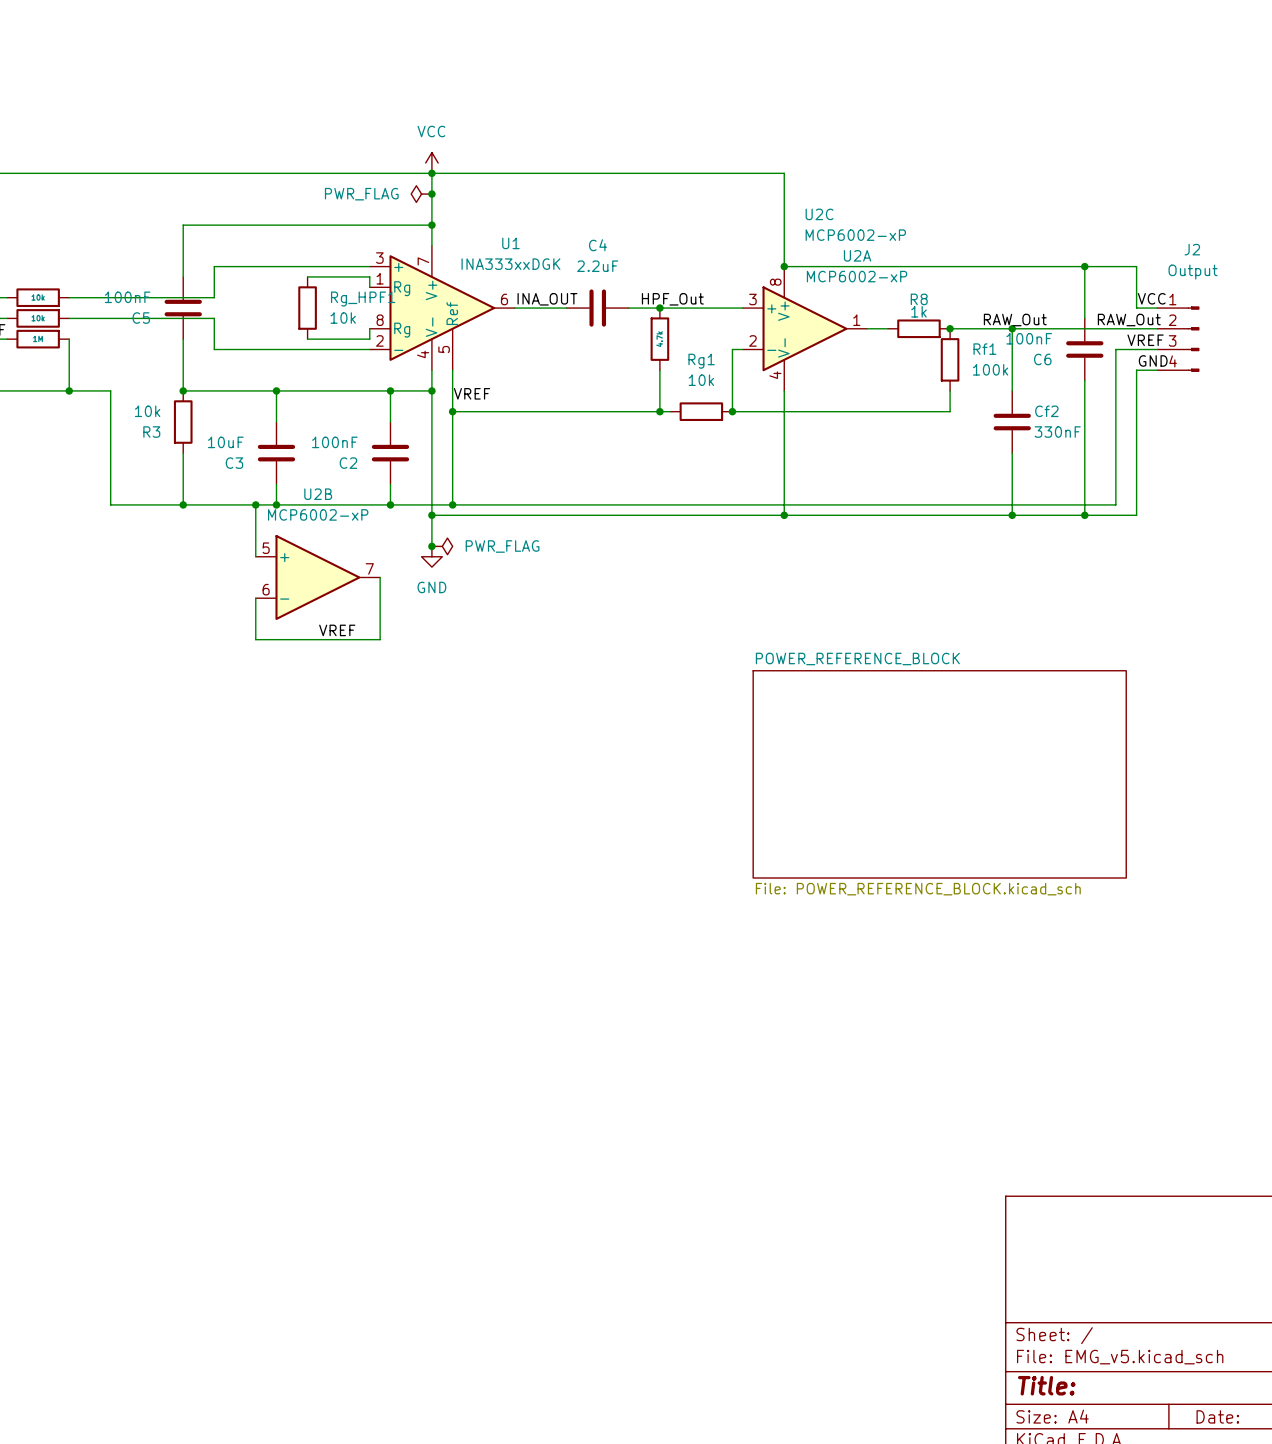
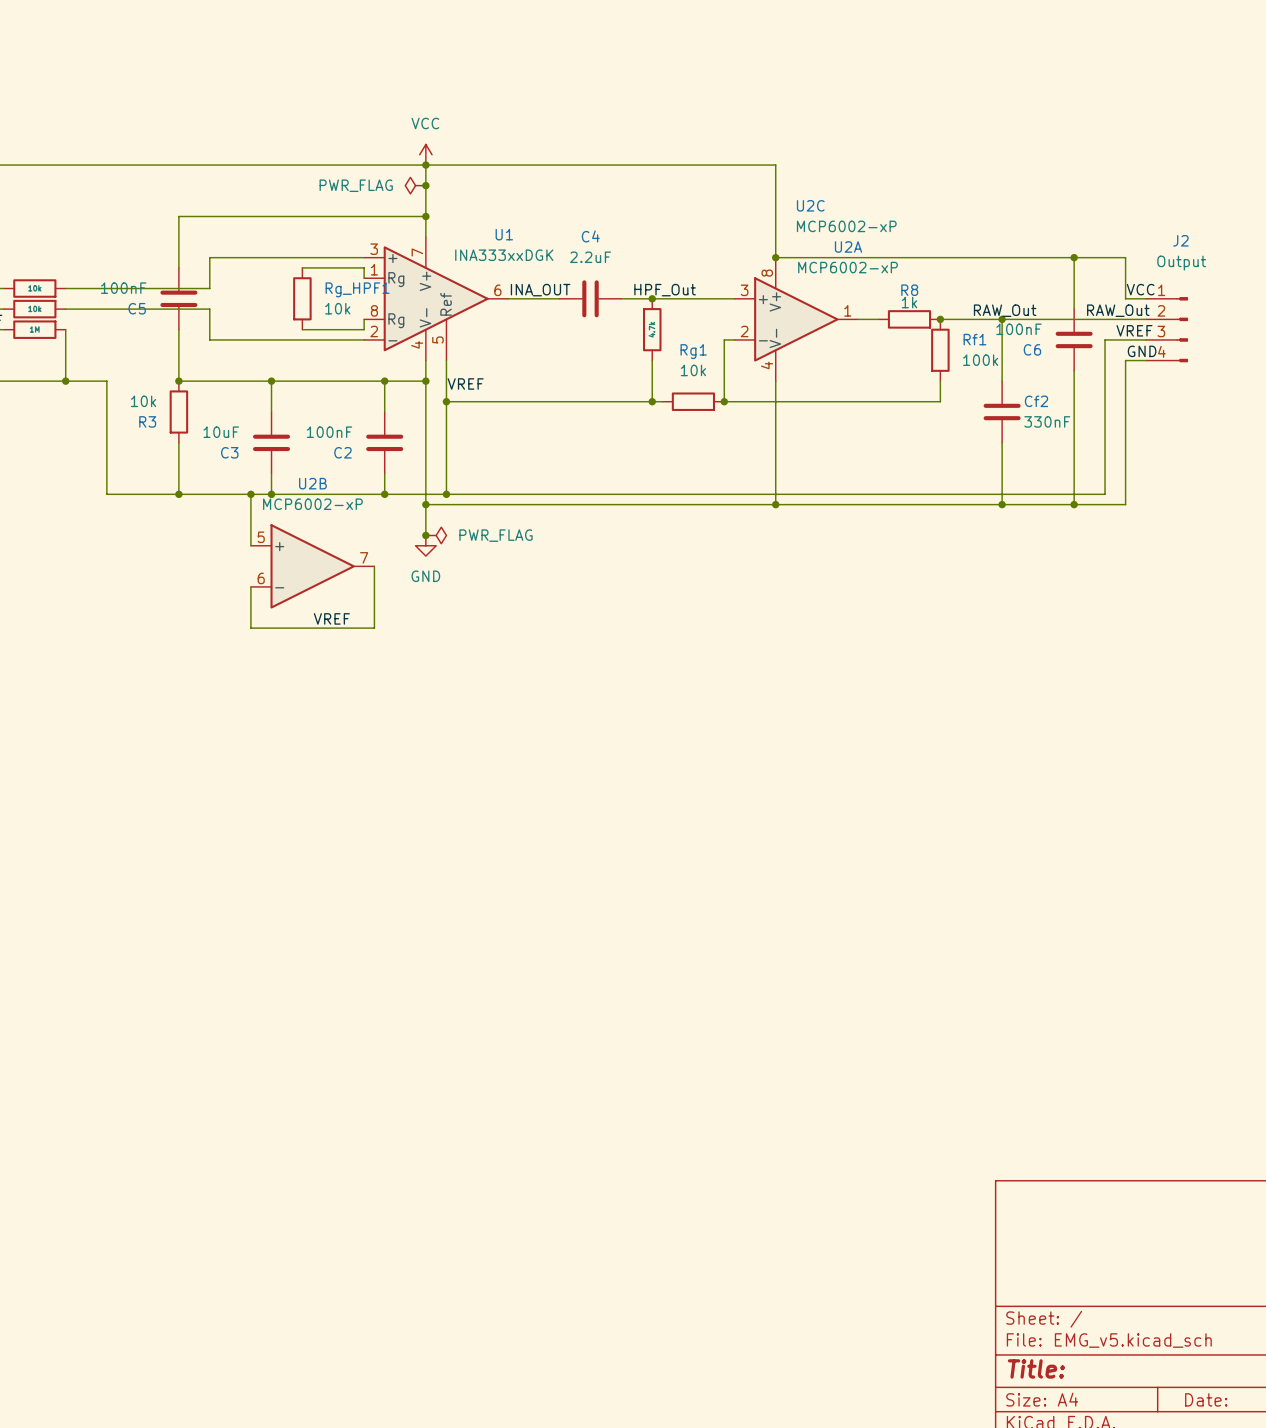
sheet POWER_REFERENCE_BLOCK: File: POWER_REFERENCE_BLOCK.kicad_sch (939, 774) -> none

